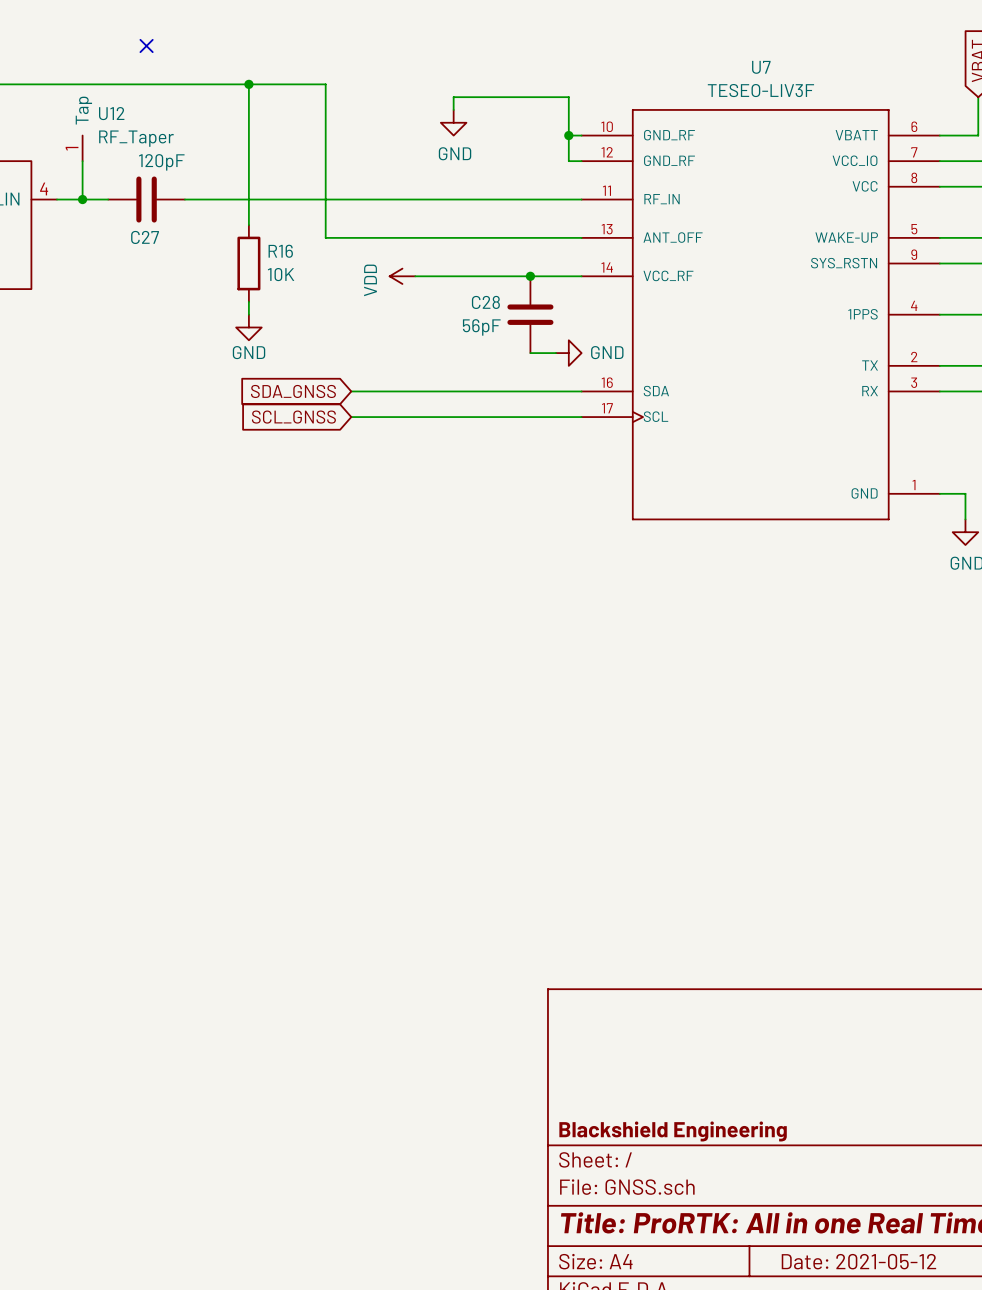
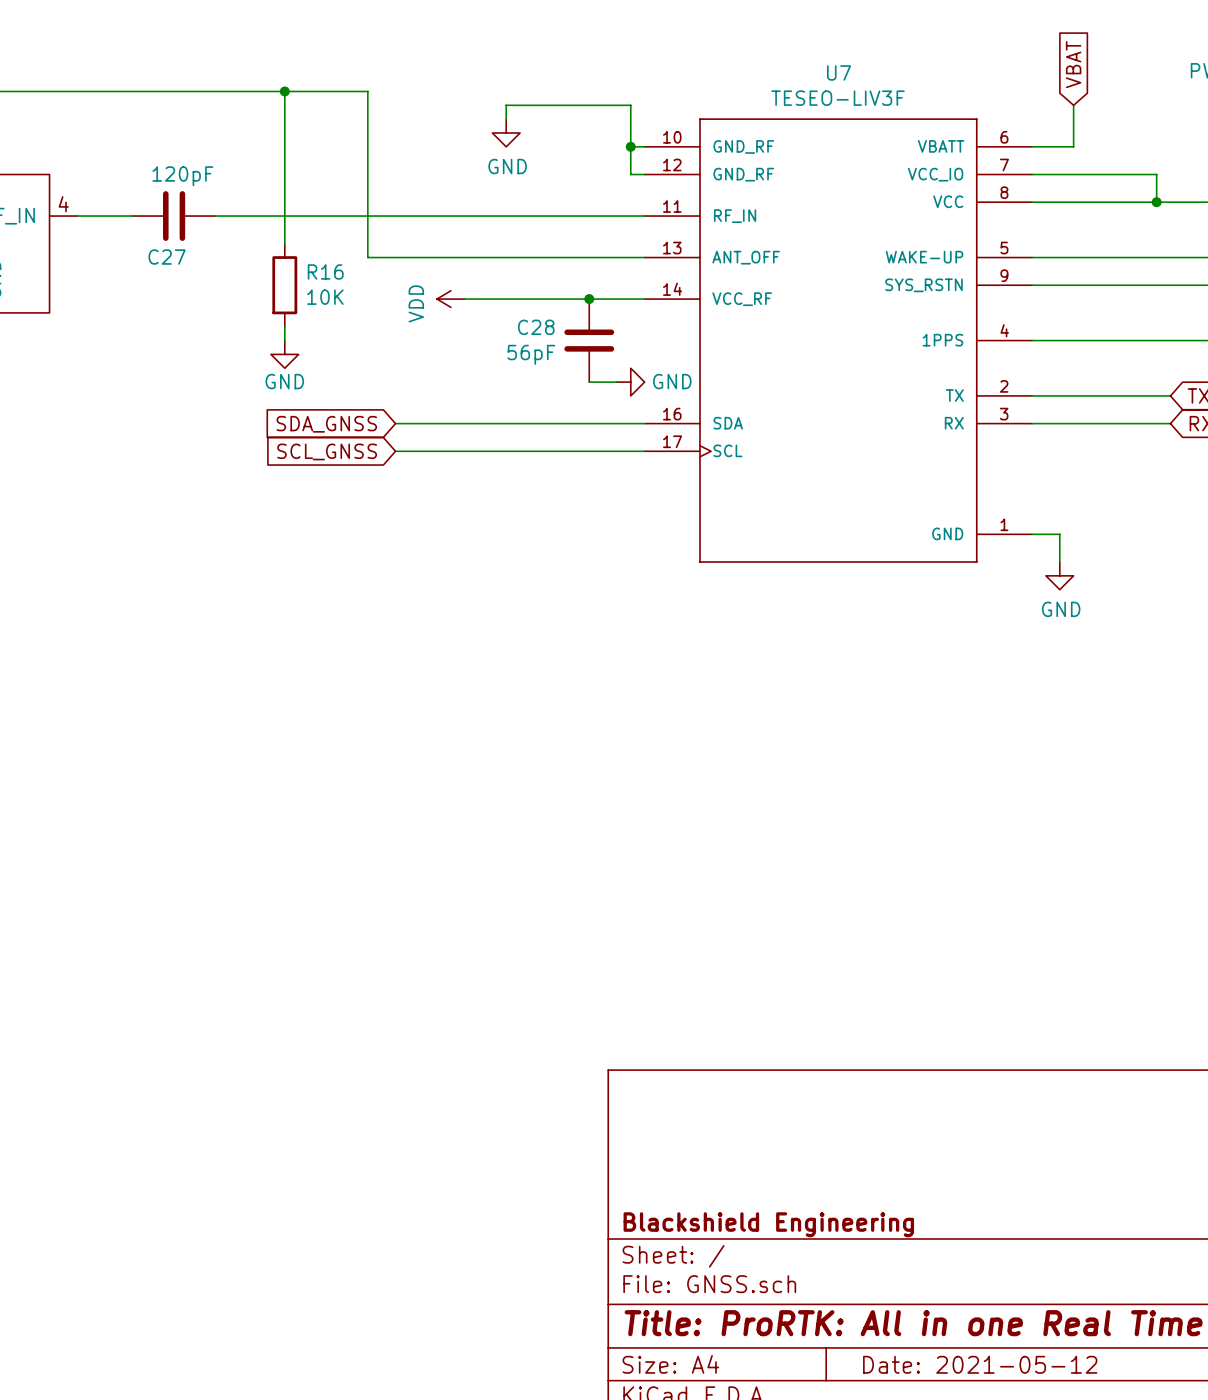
no-connect mark: (146, 45) -> none
U12: RF_Taper (82, 148) -> none
wire: (82, 161) (82, 199) -> none
junction: (82, 199) -> none

